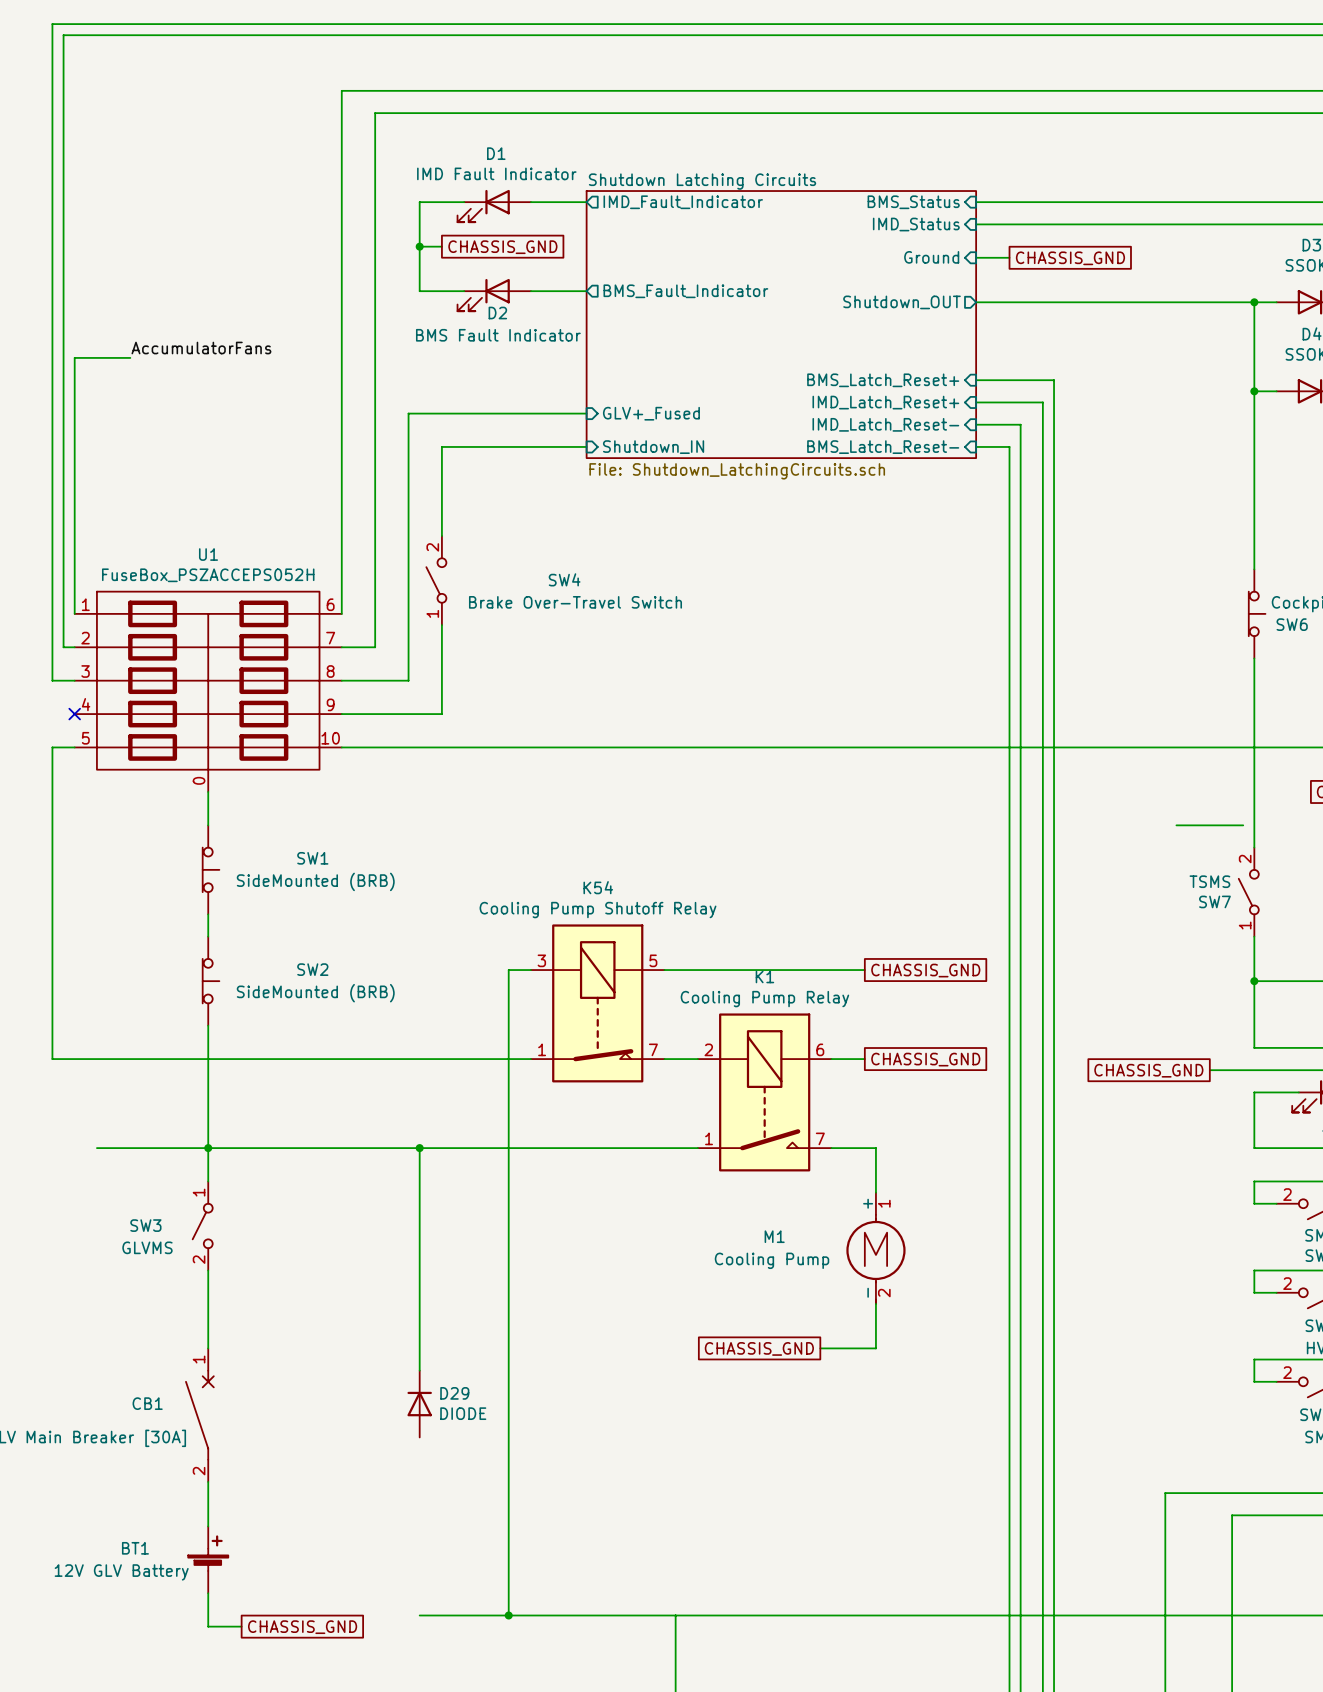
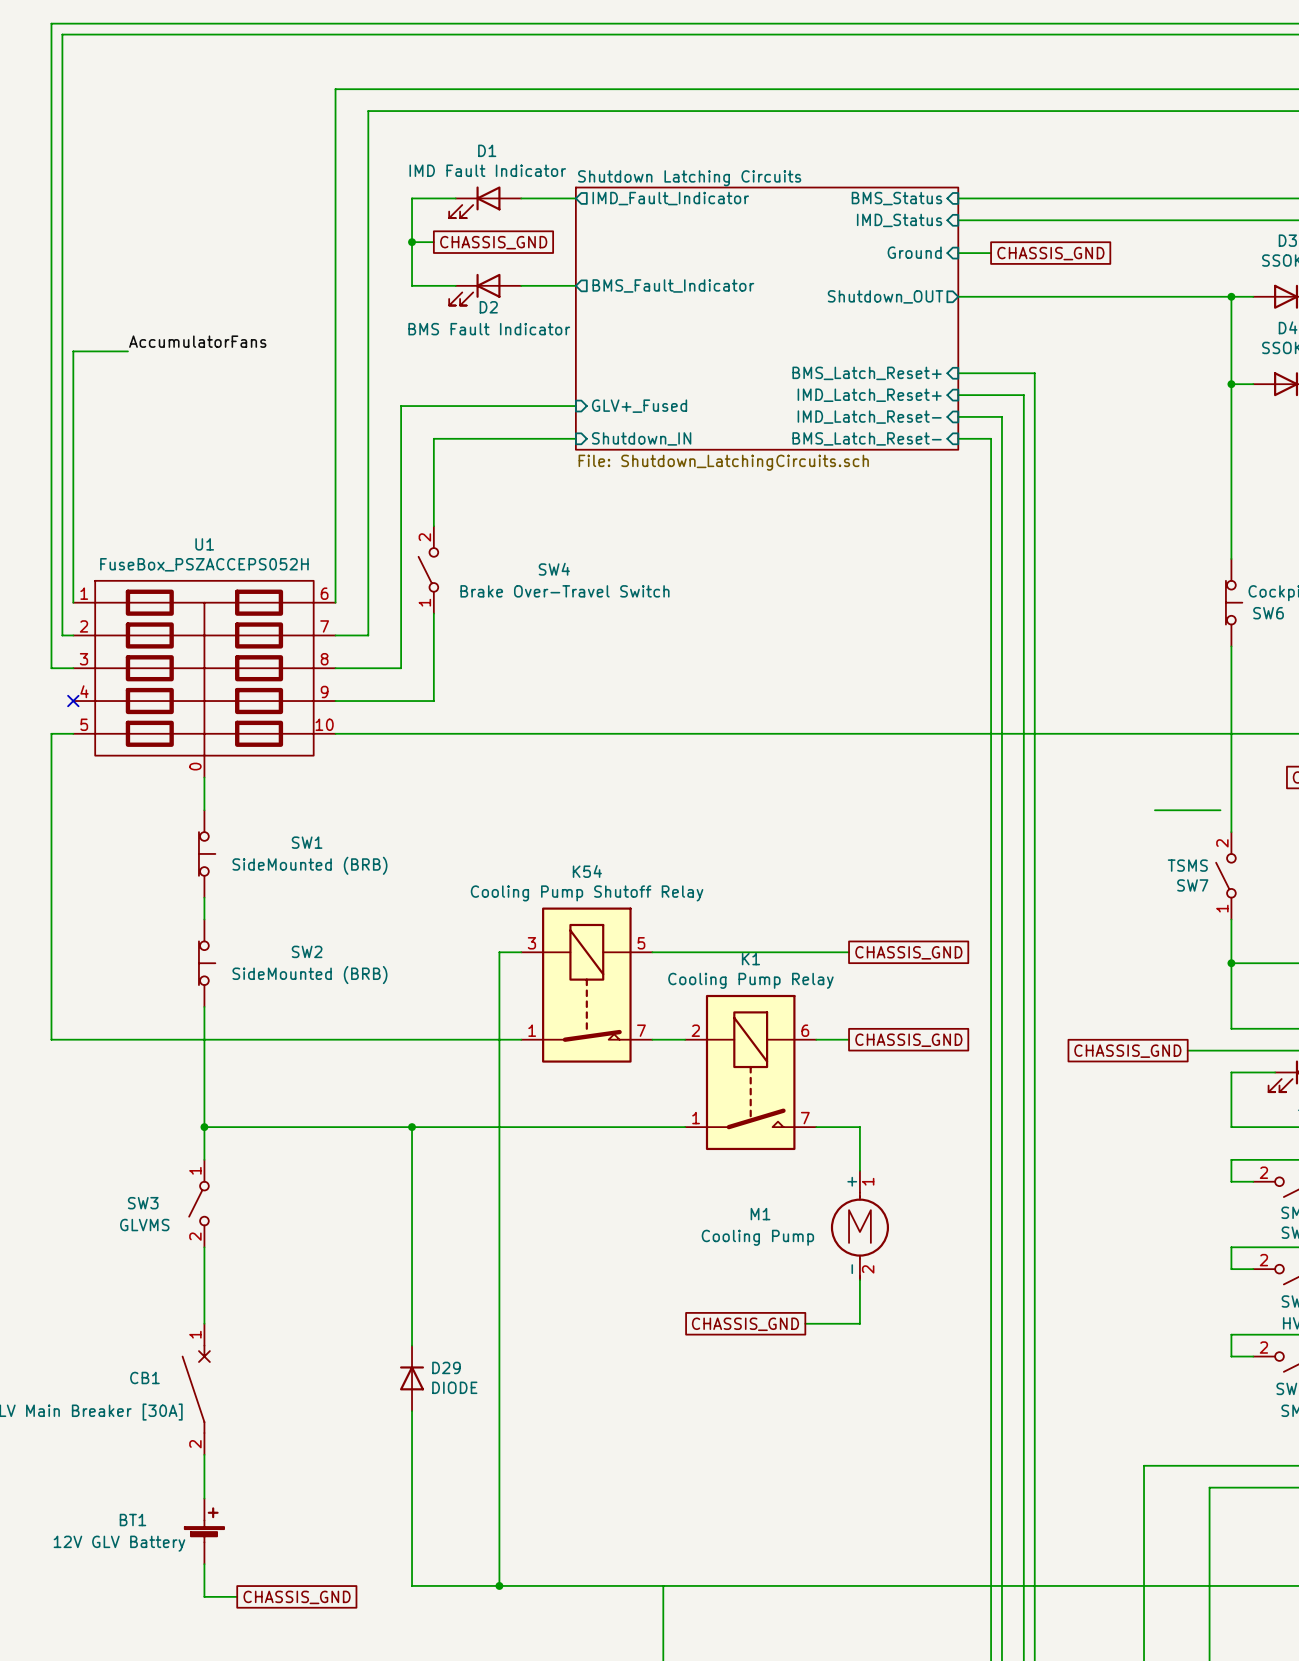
wire: (96, 1148) (208, 1148) -> none
wire: none -> (412, 1411) (412, 1585)

